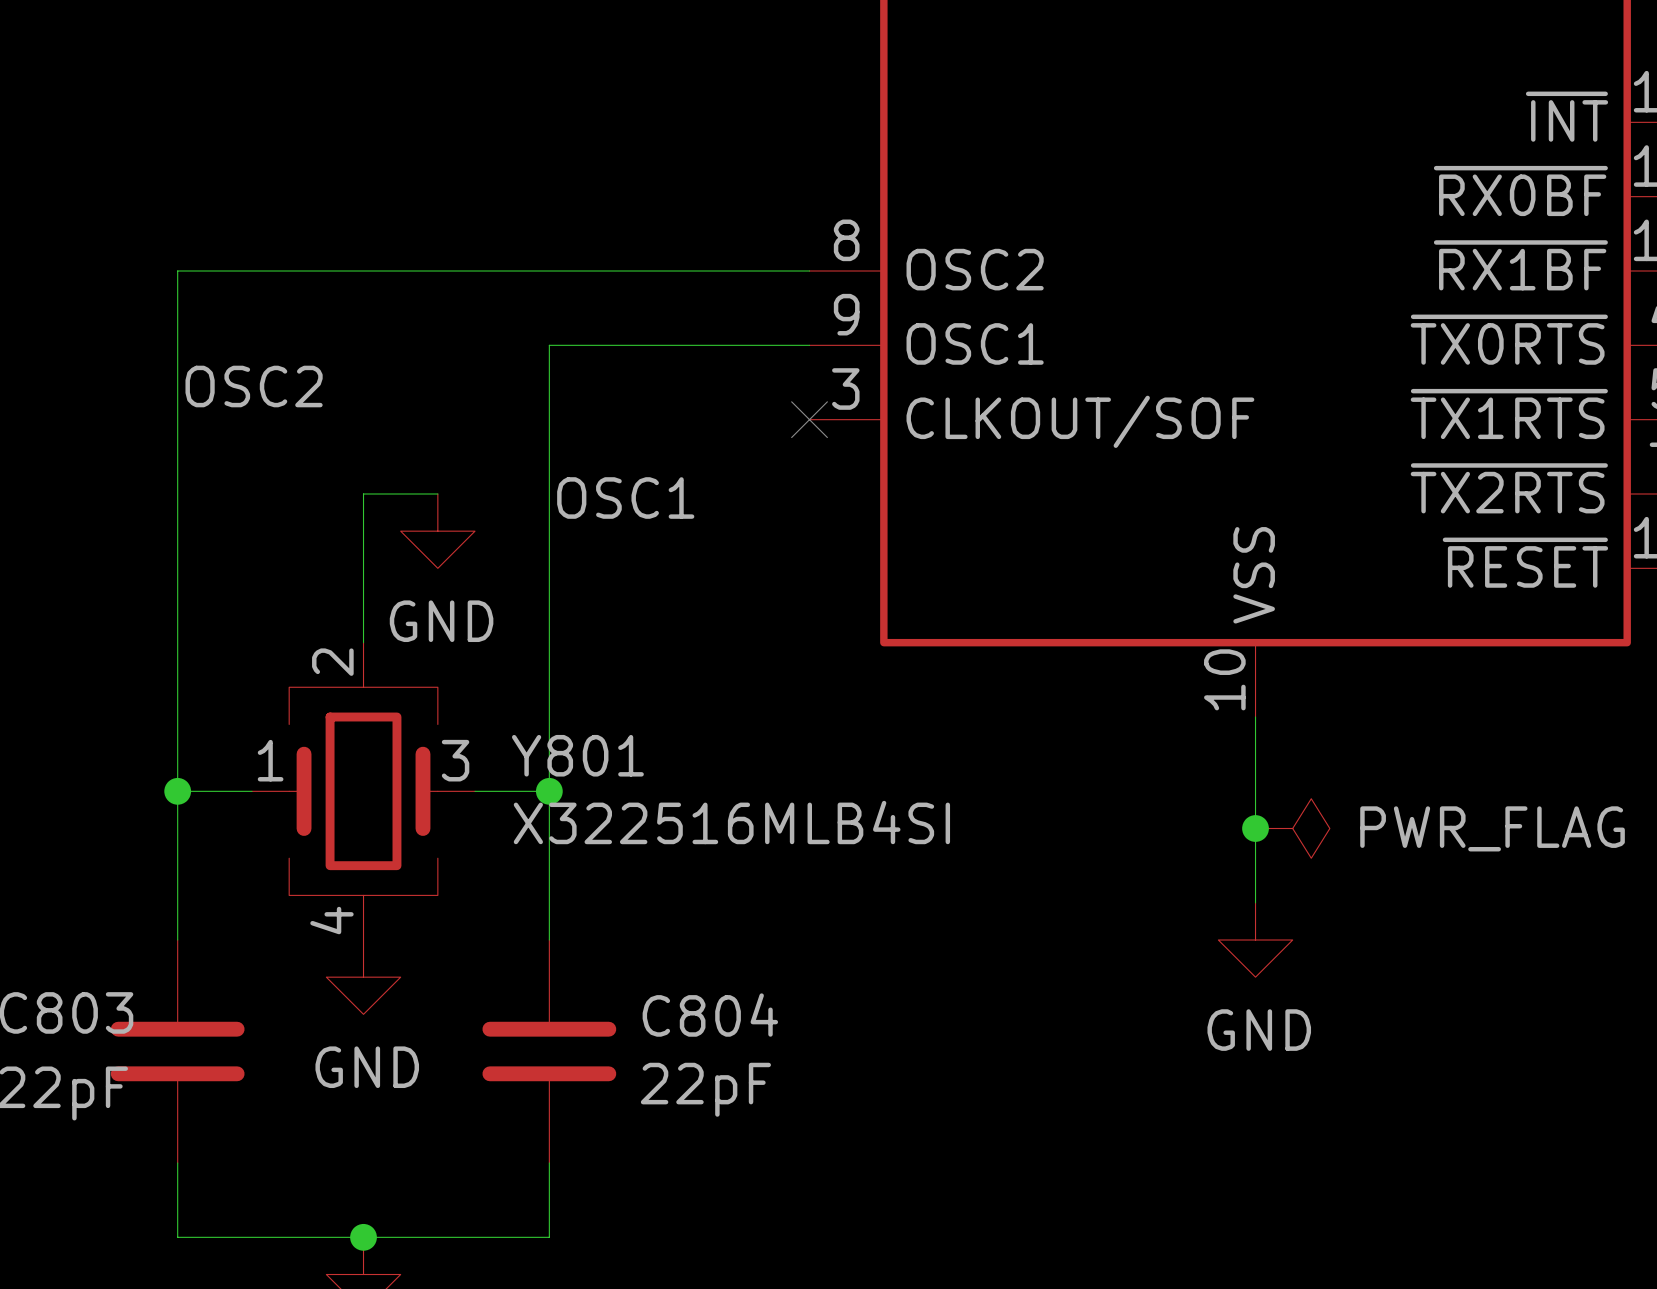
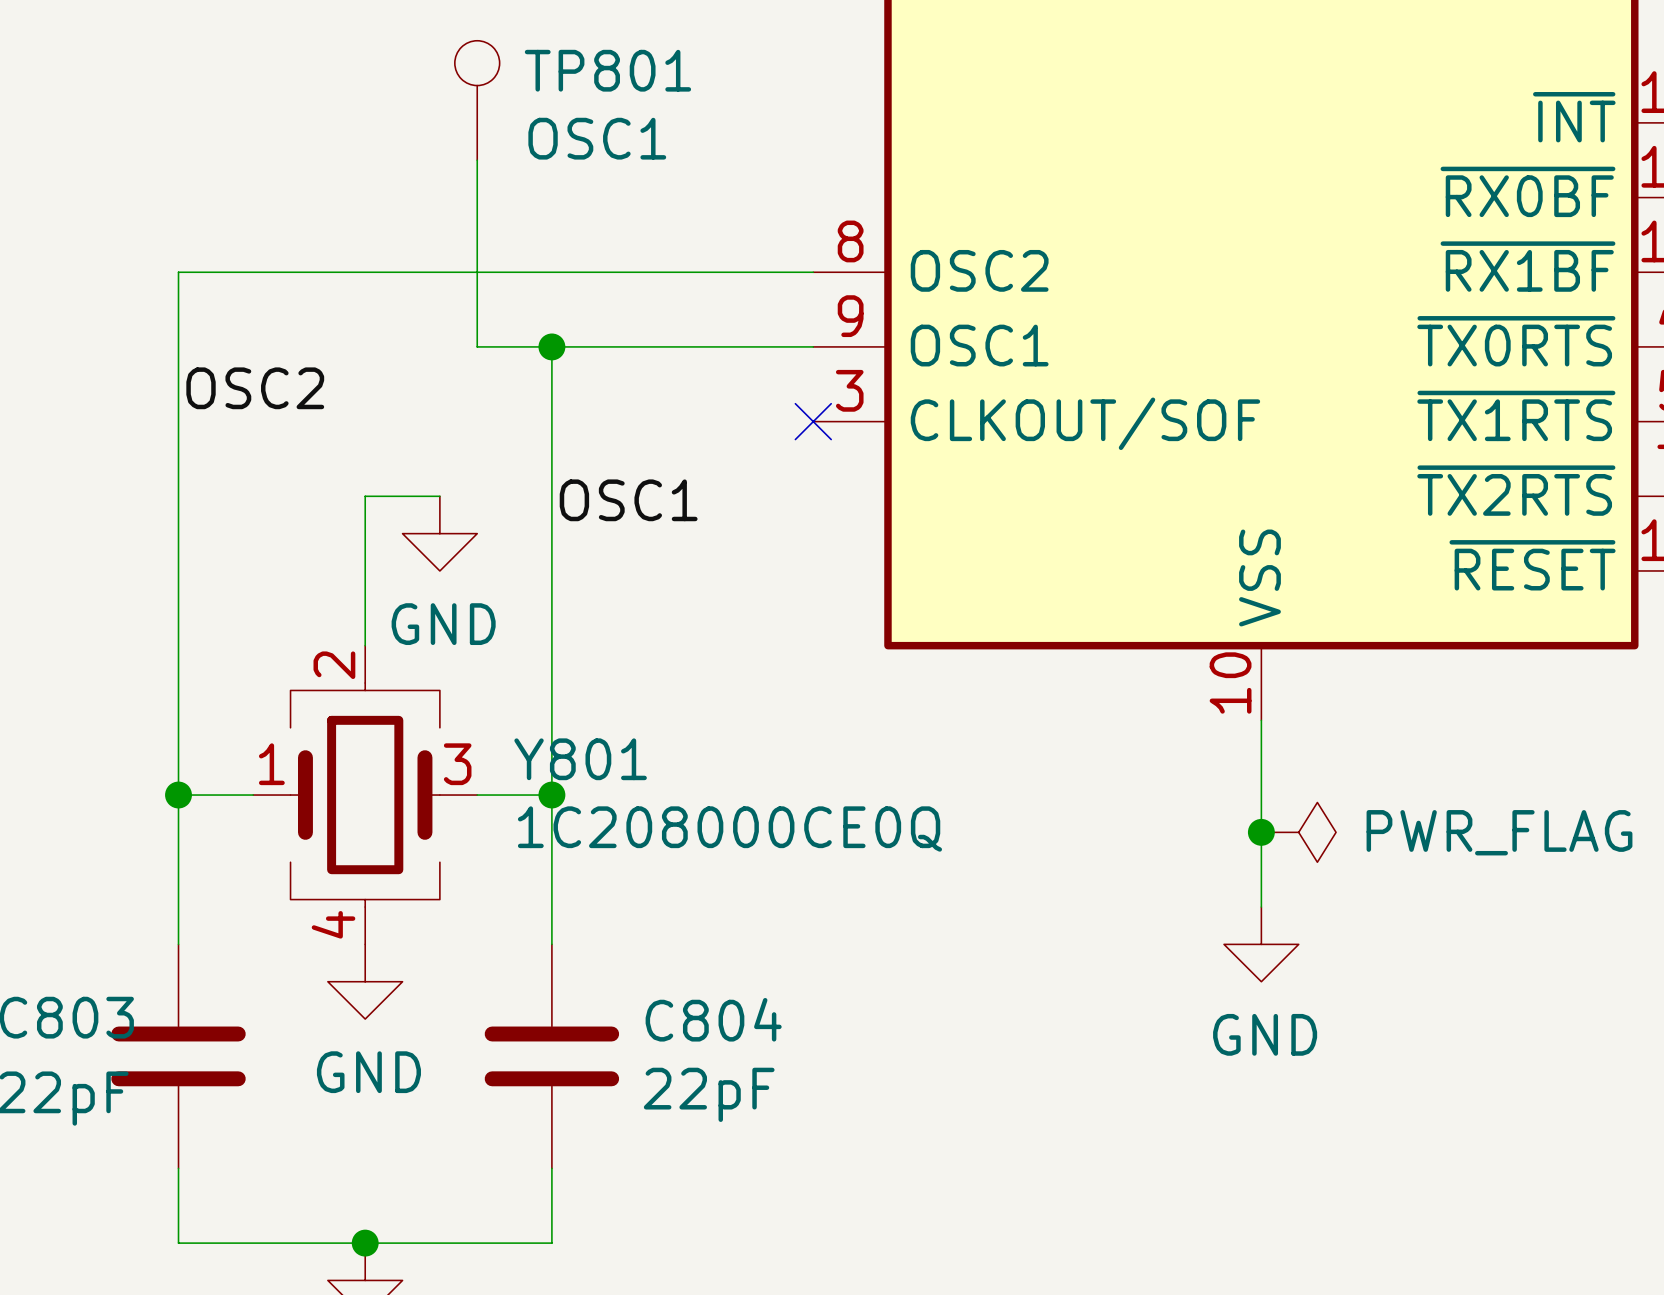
TP801: none -> OSC1 (477, 100)
wire: none -> (477, 160) (477, 346) (551, 346)
junction: none -> (551, 346)
Y801 value: X322516MLB4SI (731, 822) -> 1C208000CE0Q (729, 829)

